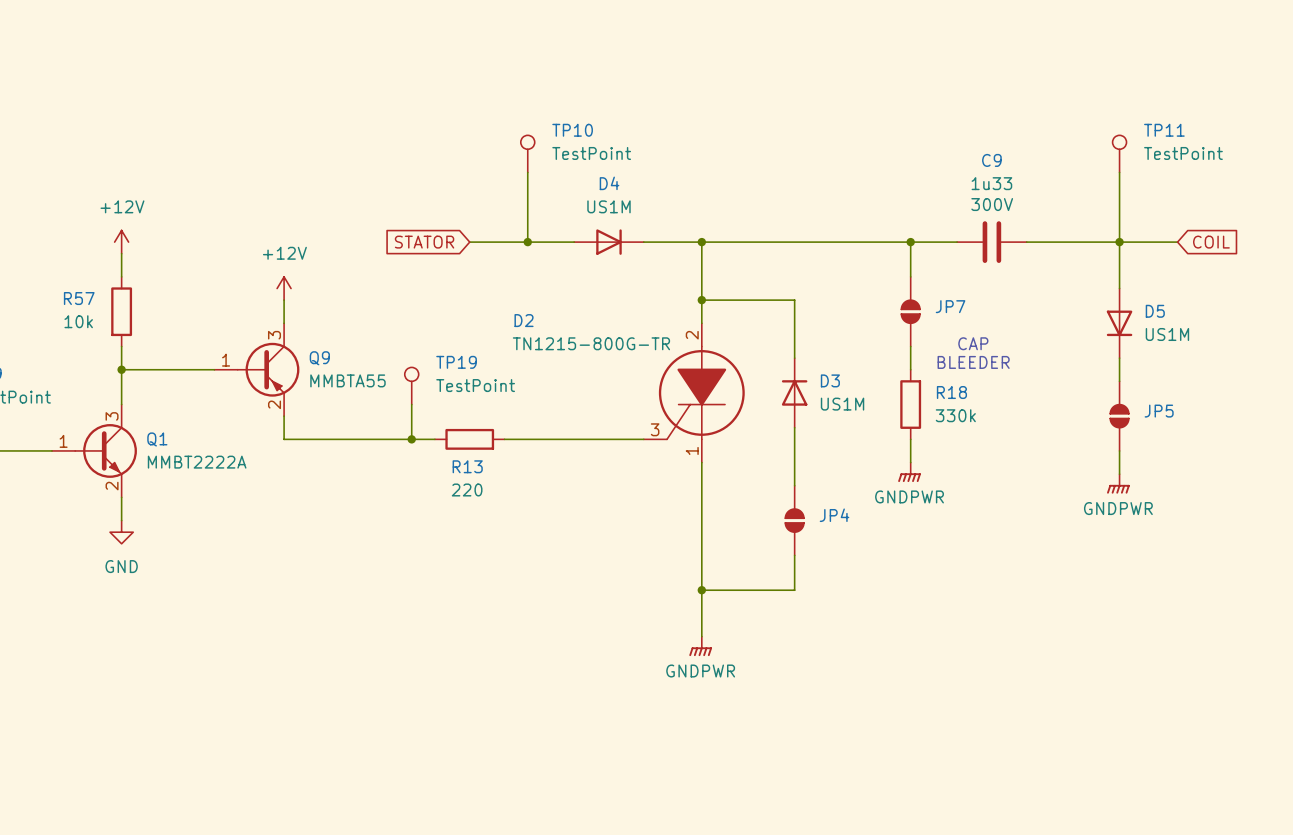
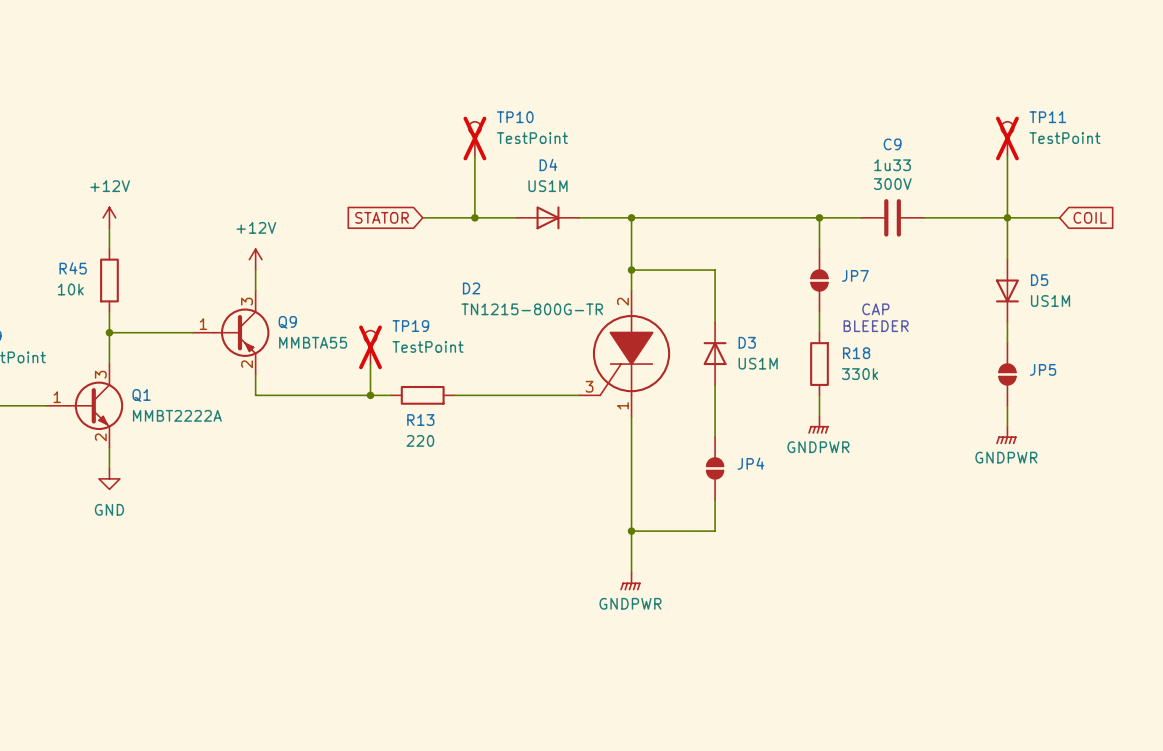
TP10 do-not-place cross: none -> (474, 138)
TP11 do-not-place cross: none -> (1007, 138)
R57 name: R57 (79, 298) -> R45 (73, 268)
TP19 do-not-place cross: none -> (370, 347)

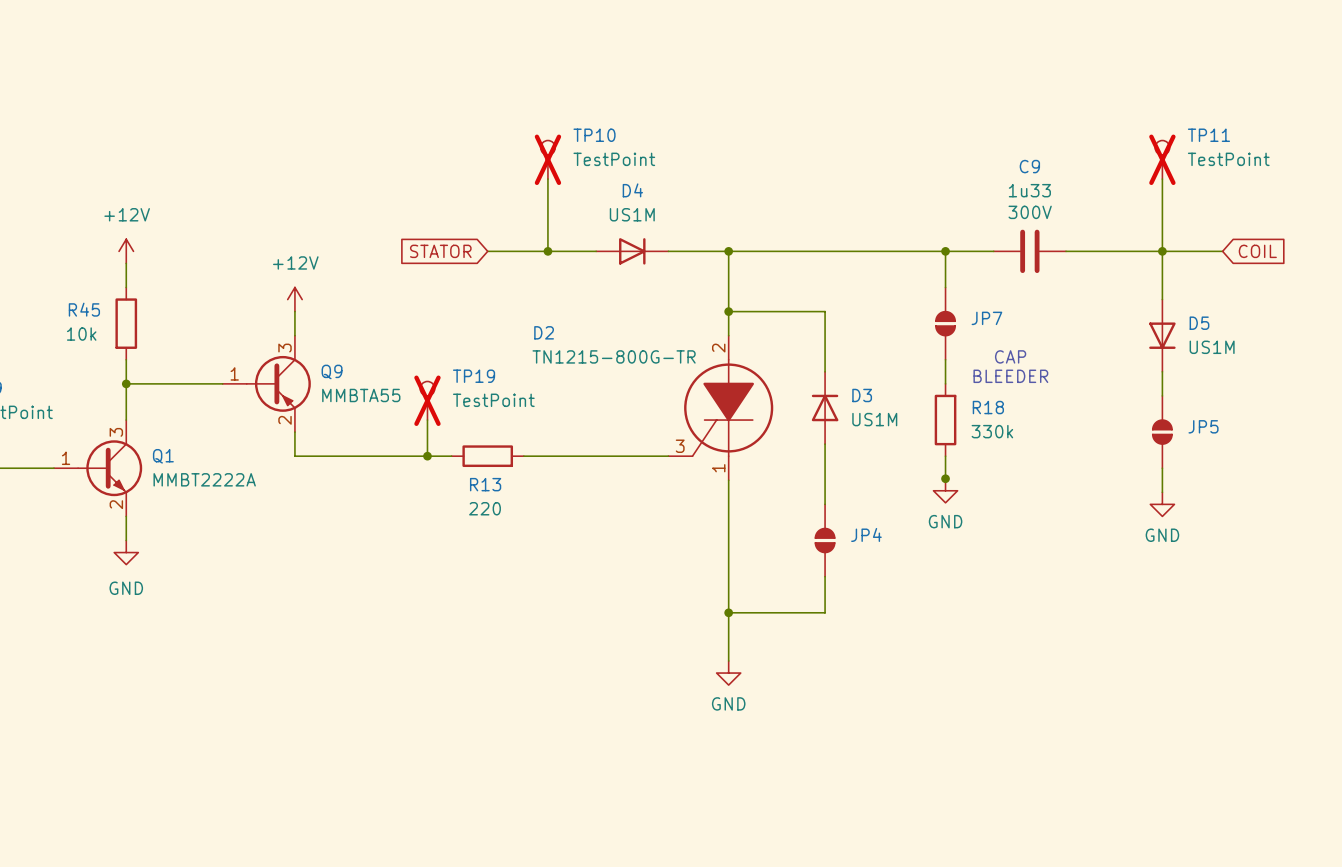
junction: none -> (945, 478)
power symbol: GNDPWR (818, 425) -> GND (945, 490)
power symbol: GNDPWR (1006, 435) -> GND (1162, 504)
power symbol: GNDPWR (630, 581) -> GND (728, 673)

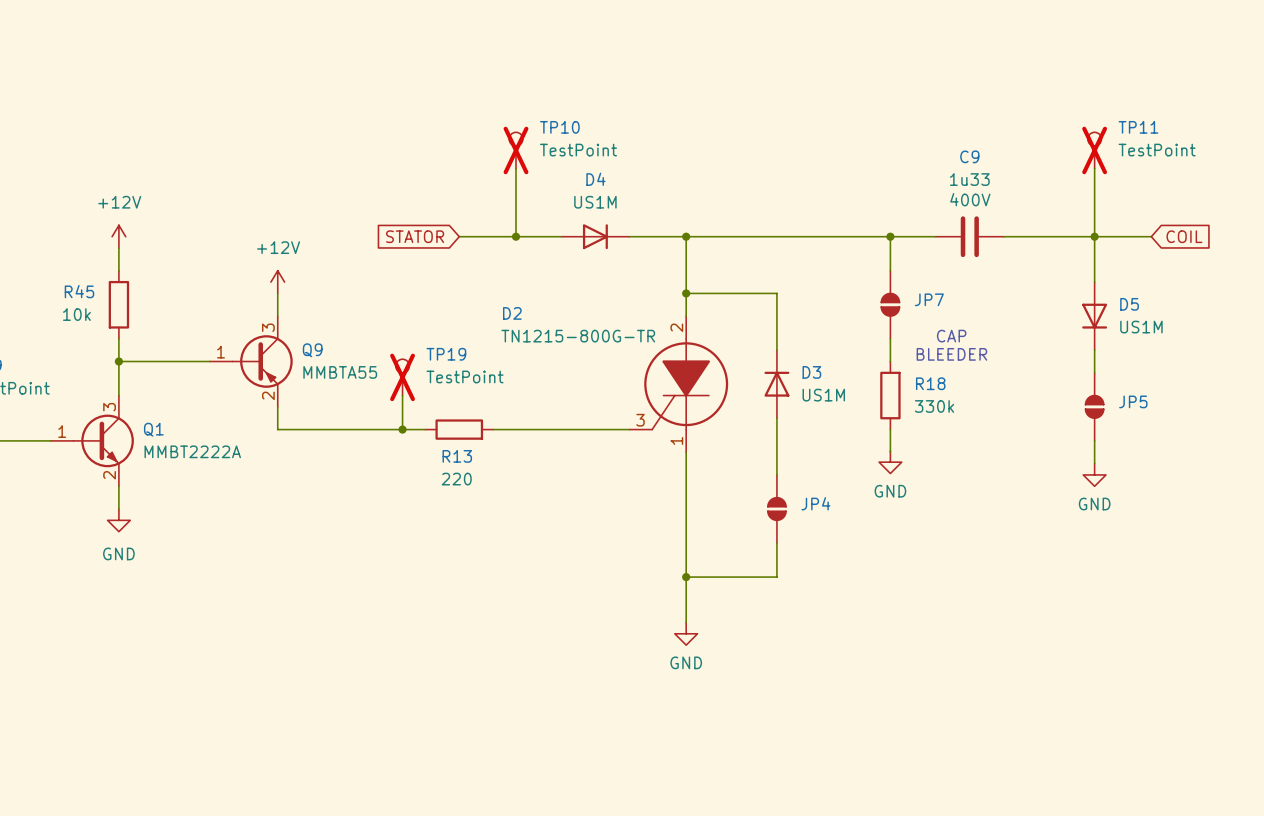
C9 text: 300V (1030, 212) -> 400V (970, 199)
junction: (945, 478) -> none

